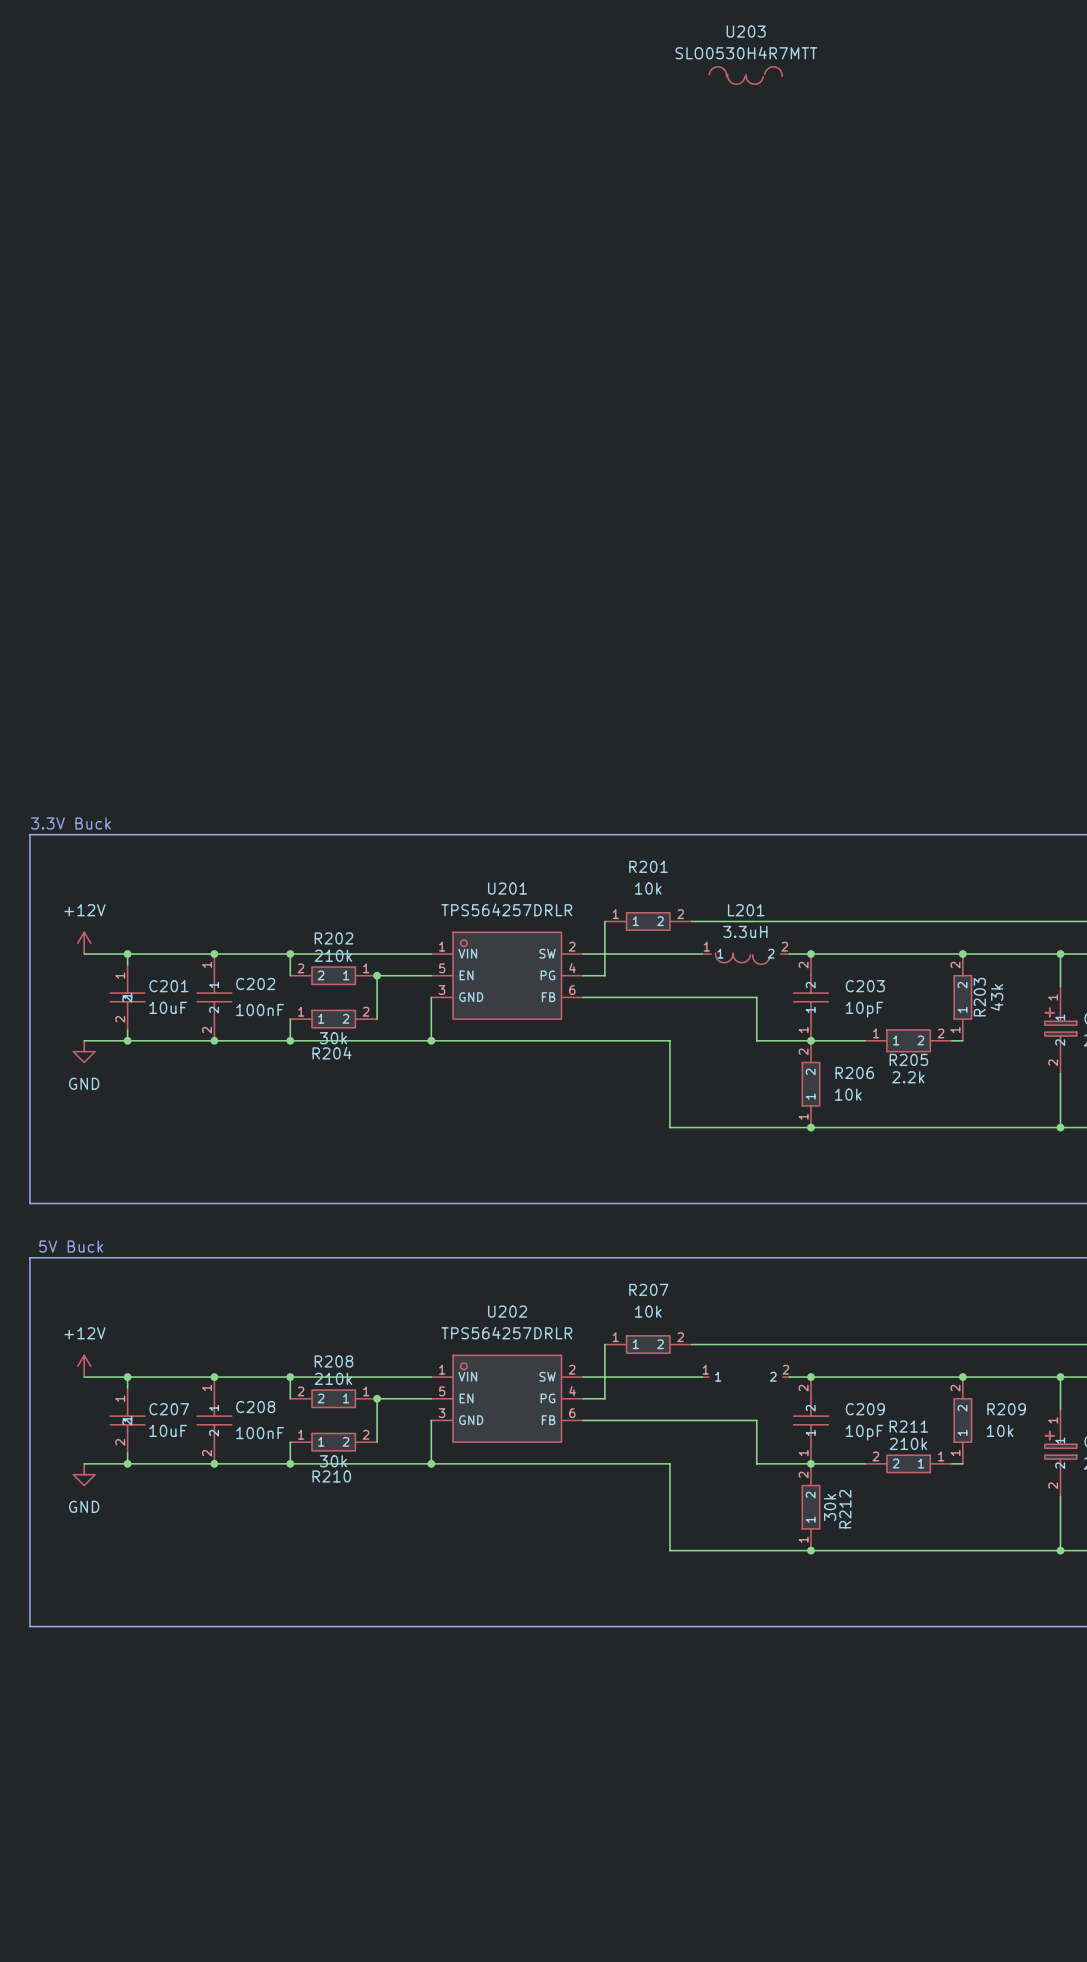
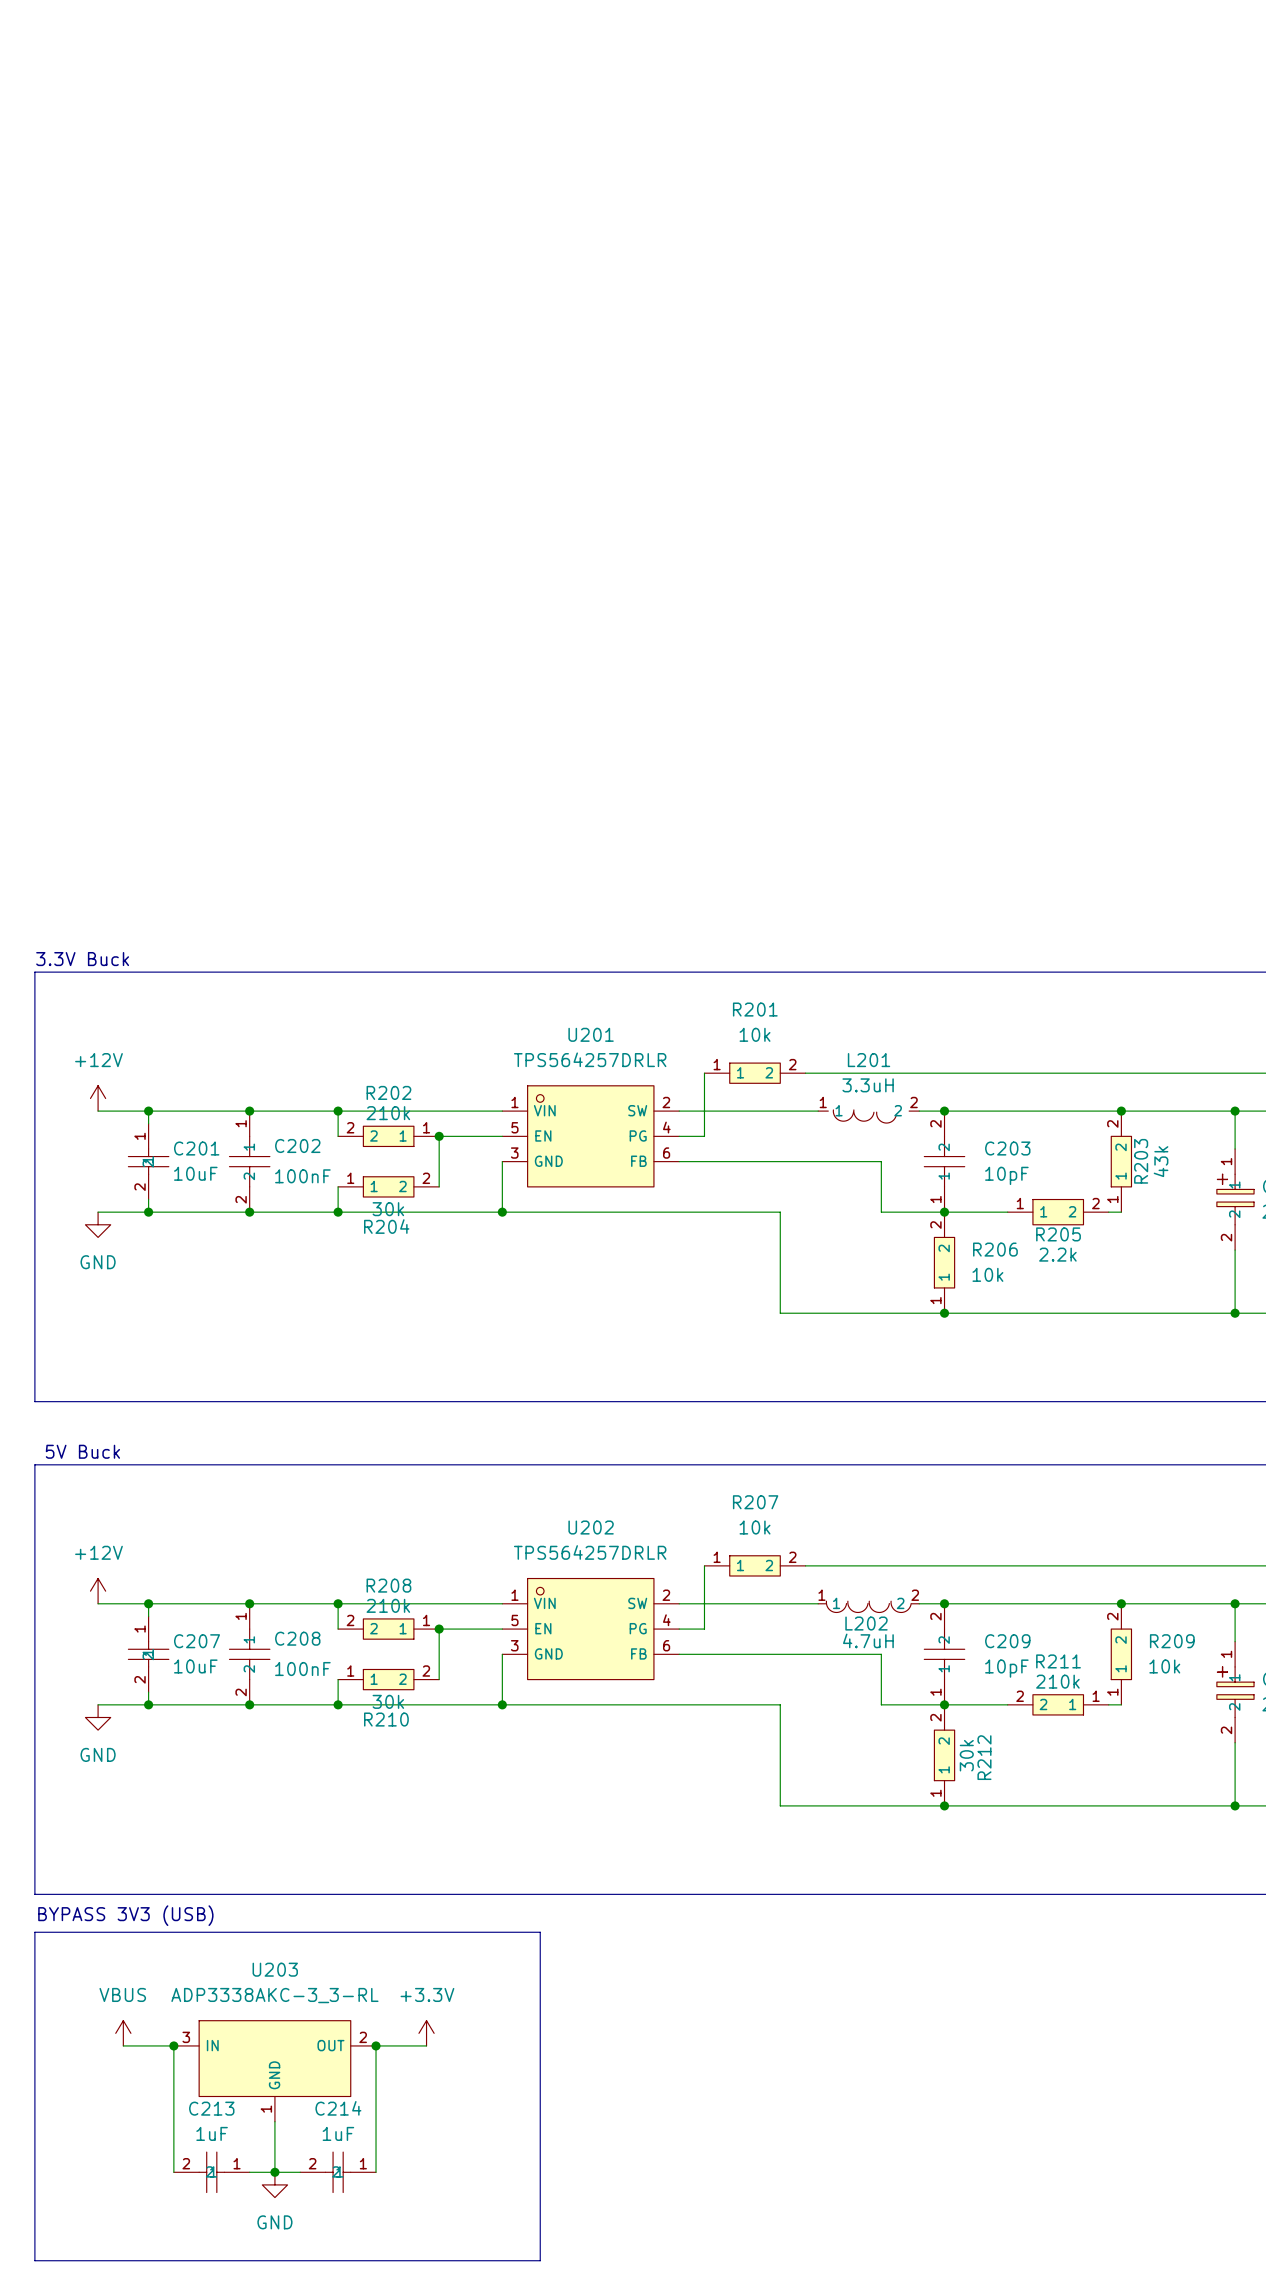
U203 name position: U203 (746, 31) -> U203 (275, 1969)
U203 value: SLO0530H4R7MTT (746, 53) -> ADP3338AKC-3_3-RL (274, 1995)
U203 symbol: [702, 66, 790, 1378] -> [173, 2020, 377, 2122]
L202: none -> 4.7uH (868, 1606)
text: none -> BYPASS 3V3 (USB) (125, 1915)
line: none -> (34, 1932) (540, 1932) (540, 2260) (34, 2260) (34, 1932)
power symbol: none -> VBUS (123, 2033)
power symbol: none -> +3.3V (426, 2033)
wire: none -> (123, 2045) (173, 2045) (173, 2172)
junction: none -> (173, 2045)
junction: none -> (376, 2045)
wire: none -> (426, 2045) (376, 2045) (376, 2172)
wire: none -> (274, 2121) (274, 2172)
C213: none -> 1uF (211, 2172)
wire: none -> (249, 2172) (300, 2172)
junction: none -> (274, 2172)
C214: none -> 1uF (338, 2172)
power symbol: none -> GND (274, 2184)

